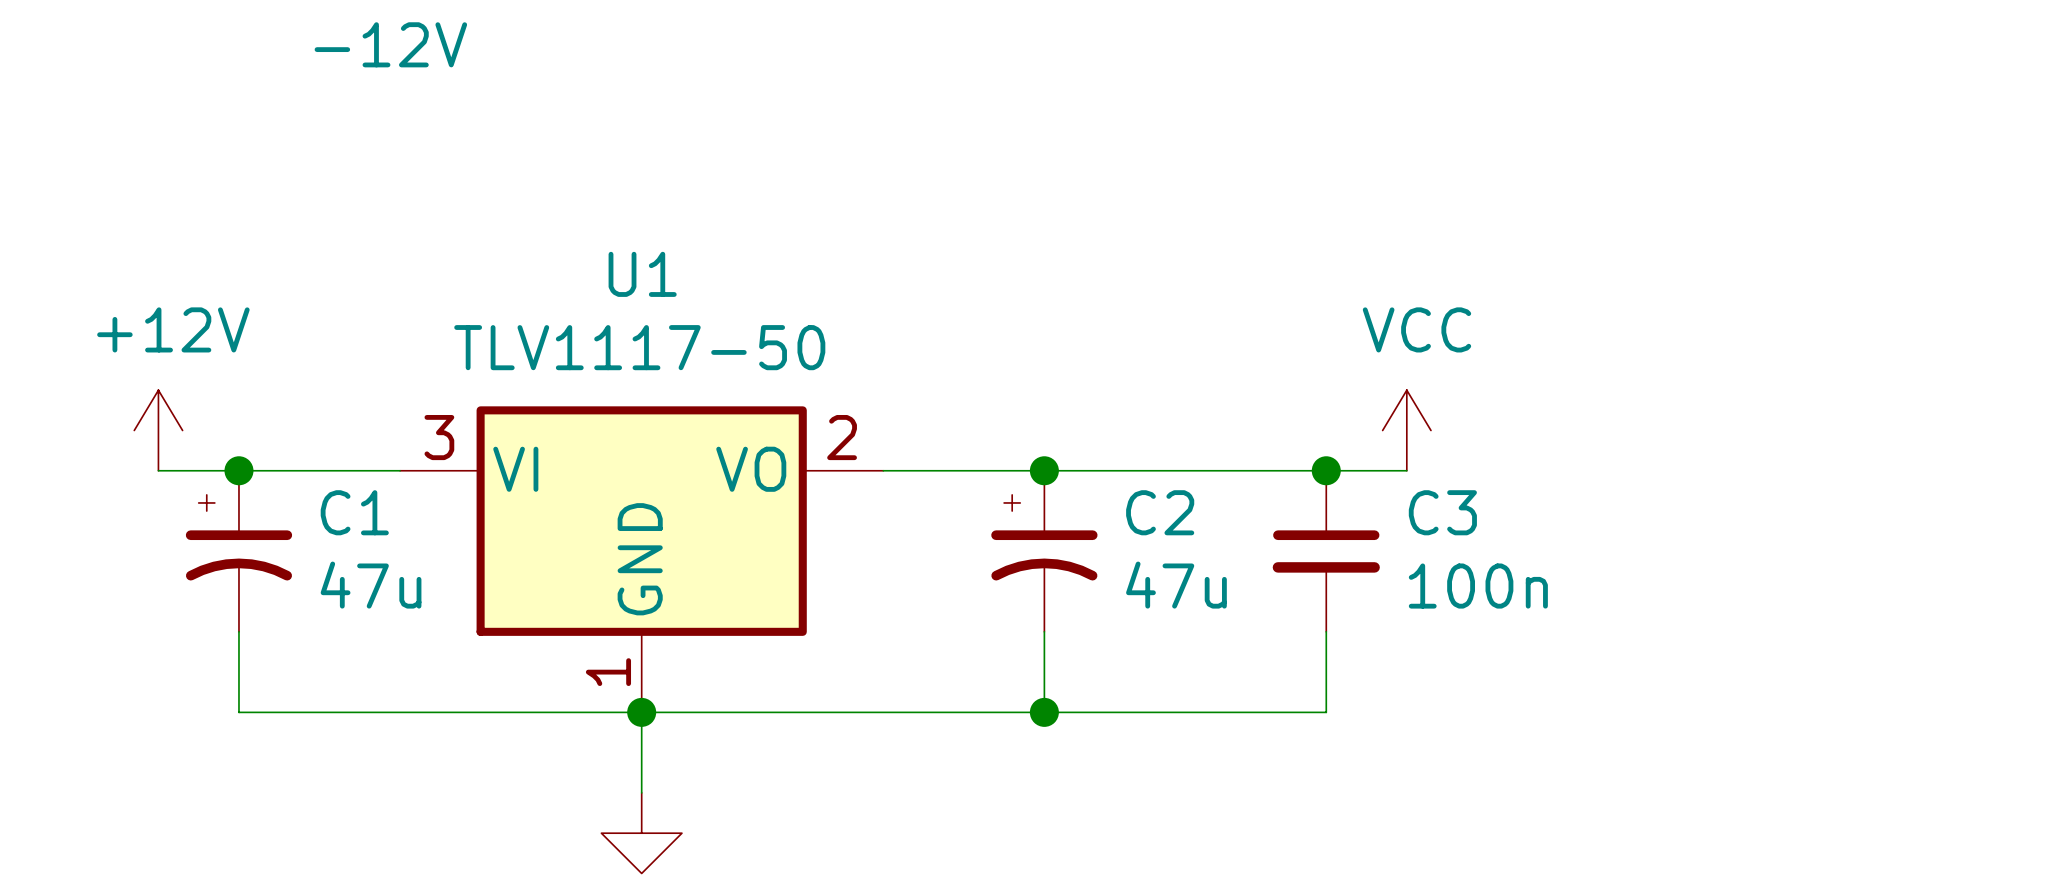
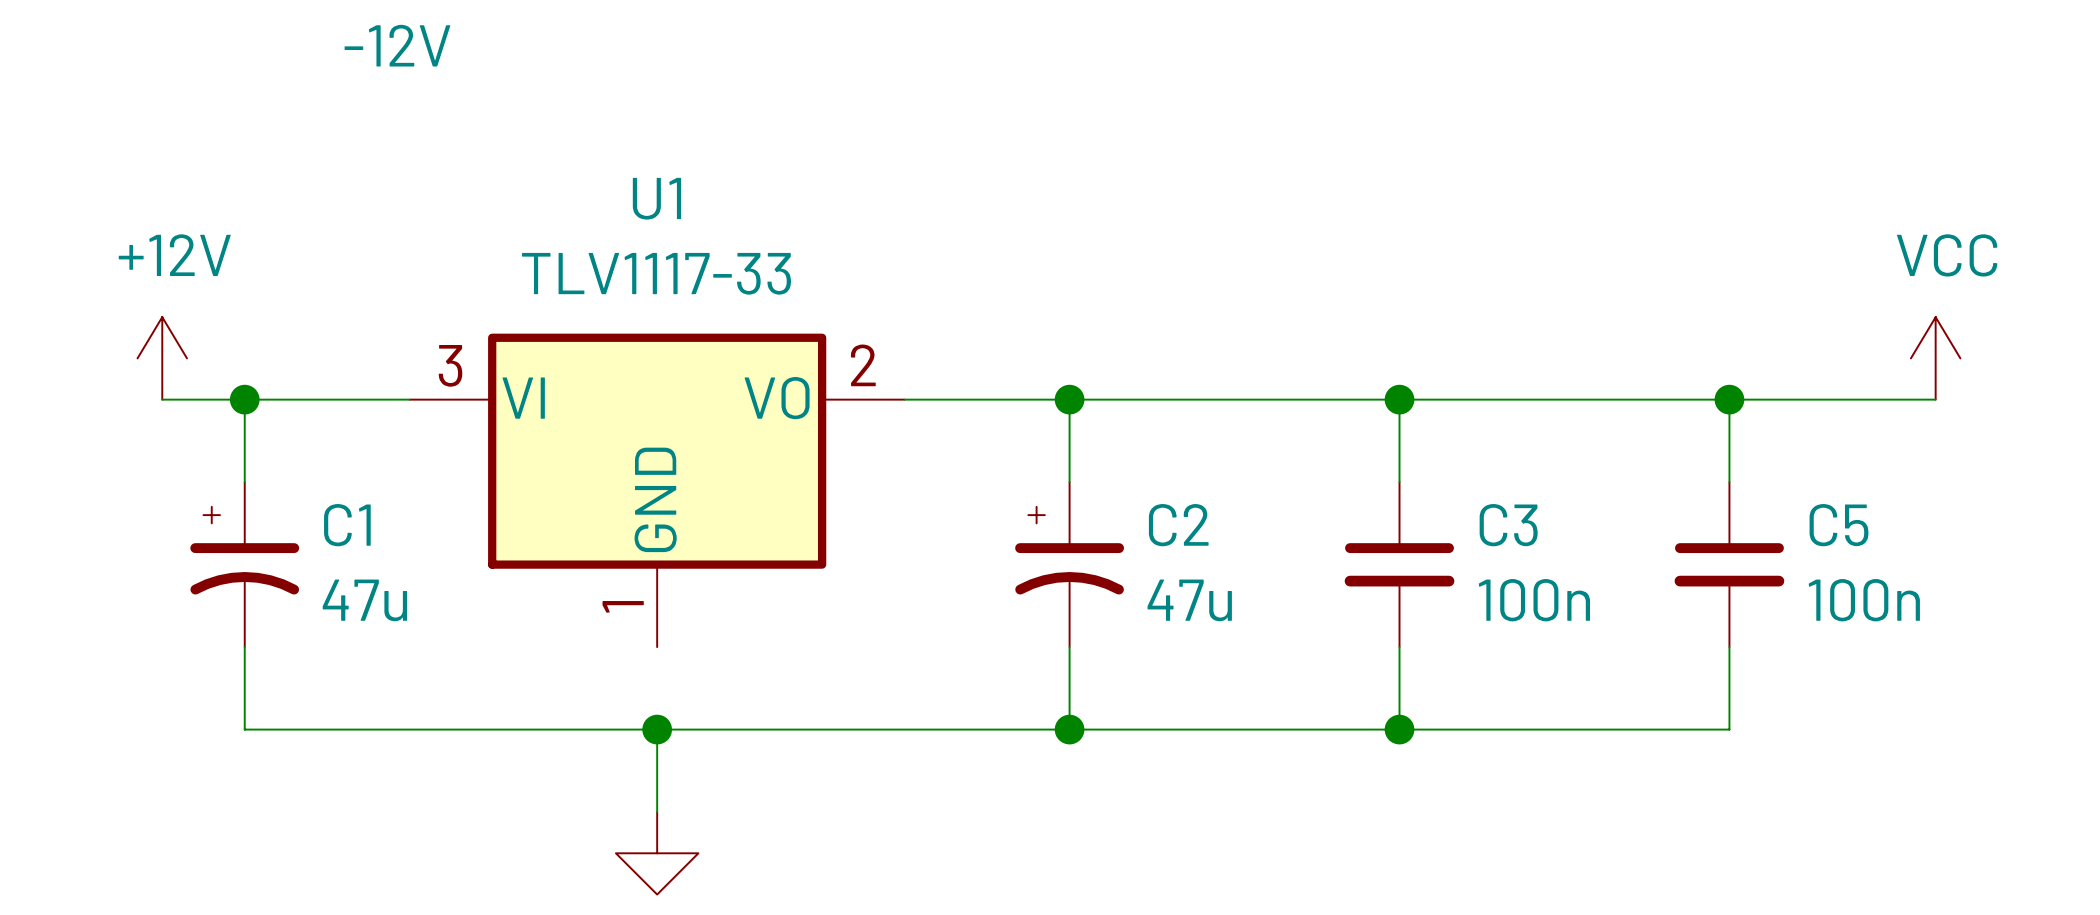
U1 value: TLV1117-50 (639, 347) -> TLV1117-33 (656, 273)
wire: none -> (244, 399) (244, 482)
wire: none -> (904, 399) (1935, 399)
wire: none -> (1069, 399) (1069, 482)
wire: none -> (1399, 399) (1399, 482)
wire: none -> (1729, 399) (1729, 482)
junction: none -> (1729, 399)
power symbol position: +12V (158, 430) -> +12V (162, 358)
power symbol position: VCC (1406, 430) -> VCC (1935, 358)
wire: (158, 470) (400, 470) -> (162, 399) (409, 399)
junction position: (238, 470) -> (244, 399)
wire: (883, 470) (1406, 470) -> none
junction position: (1044, 470) -> (1069, 399)
junction position: (1326, 470) -> (1399, 399)
C3 position: (1326, 551) -> (1399, 564)
C5: none -> 100n (1729, 564)
U1 position: (641, 559) -> (657, 490)
wire: (1326, 631) (1326, 712) -> (1729, 647) (1729, 729) (1358, 729)
wire: none -> (1399, 647) (1399, 729)
junction: none -> (1399, 729)

